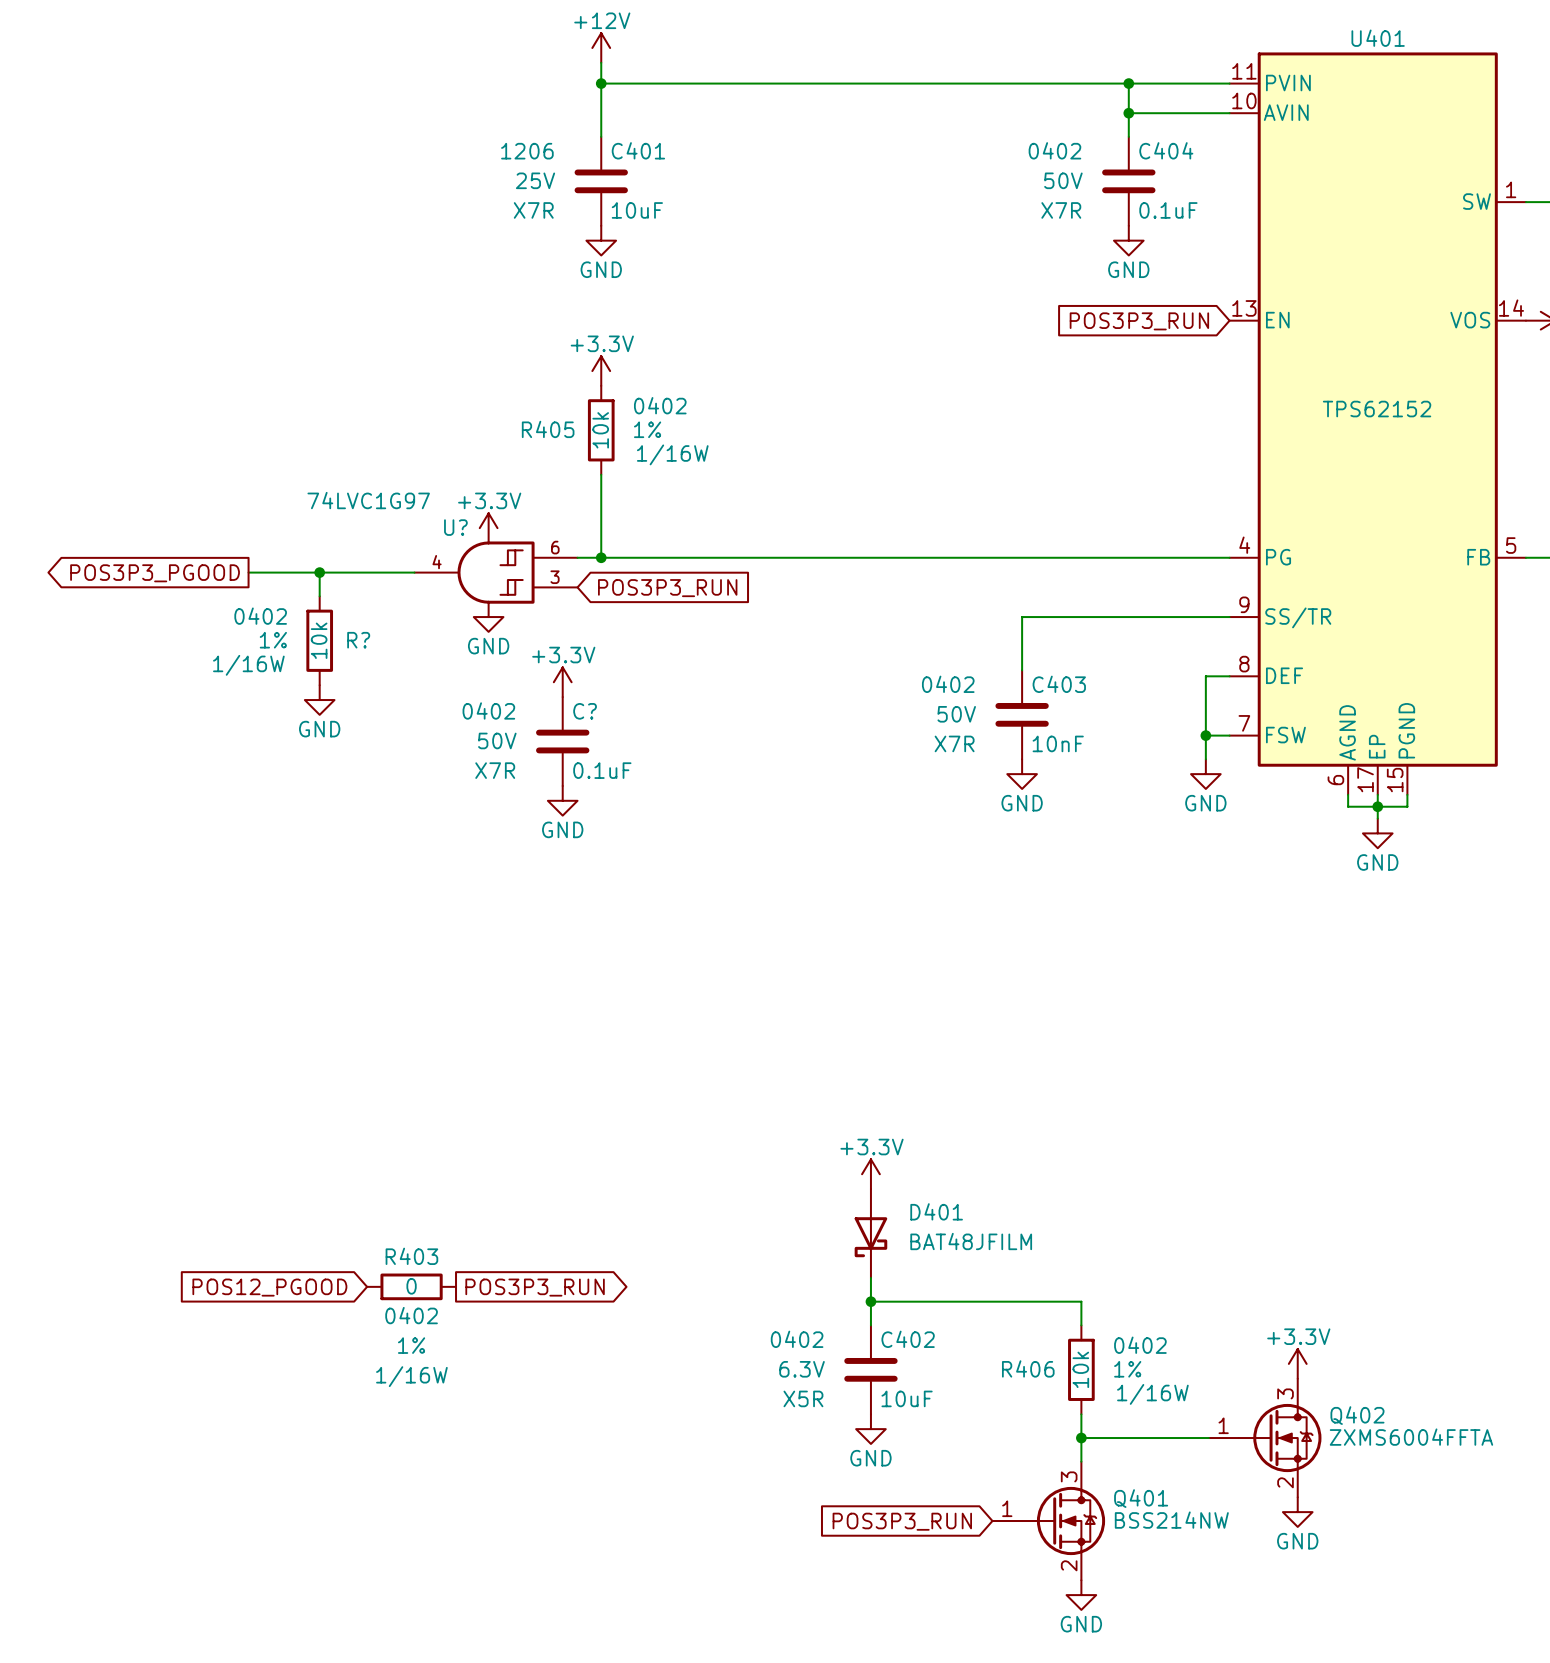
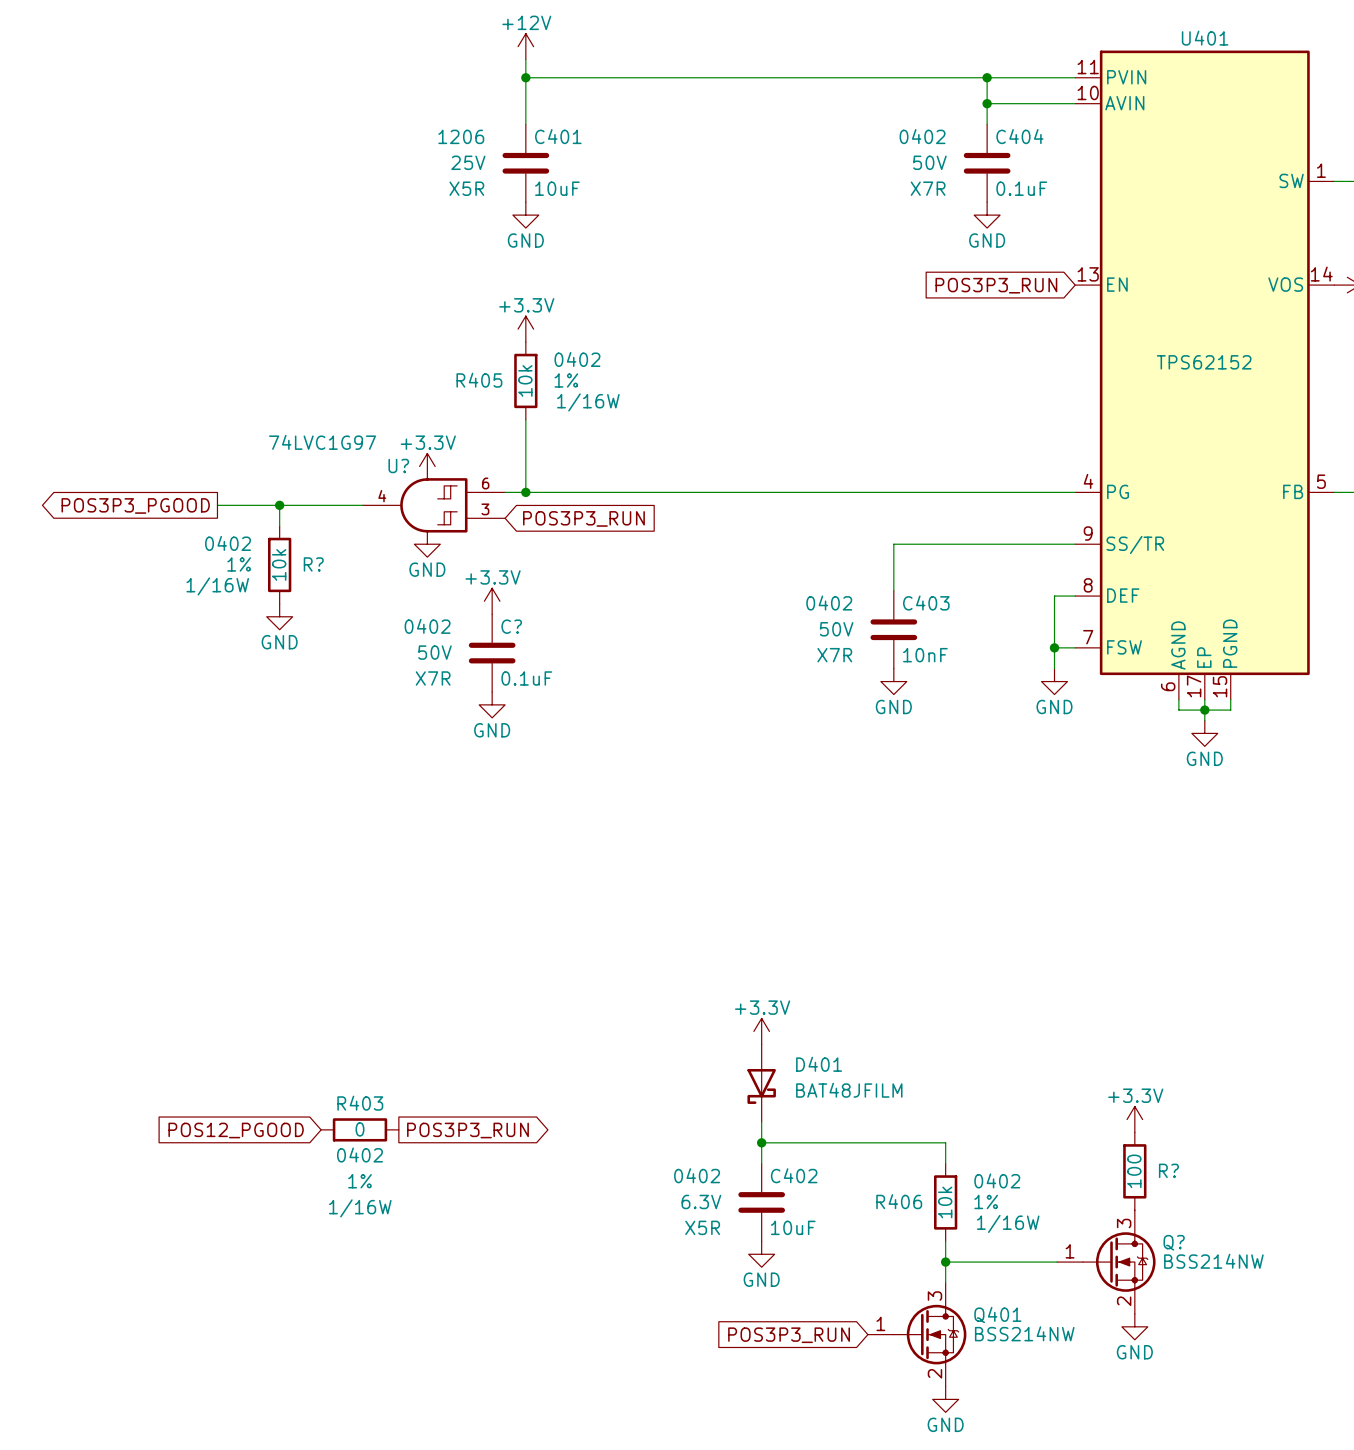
C401 text: X7R (533, 210) -> X5R (466, 188)
R?: none -> 100 (1134, 1171)
power symbol position: +3.3V (1297, 1363) -> +3.3V (1134, 1119)
Q402 name: Q402 (1357, 1415) -> Q? (1174, 1242)
Q402 value: ZXMS6004FFTA (1411, 1437) -> BSS214NW (1213, 1261)

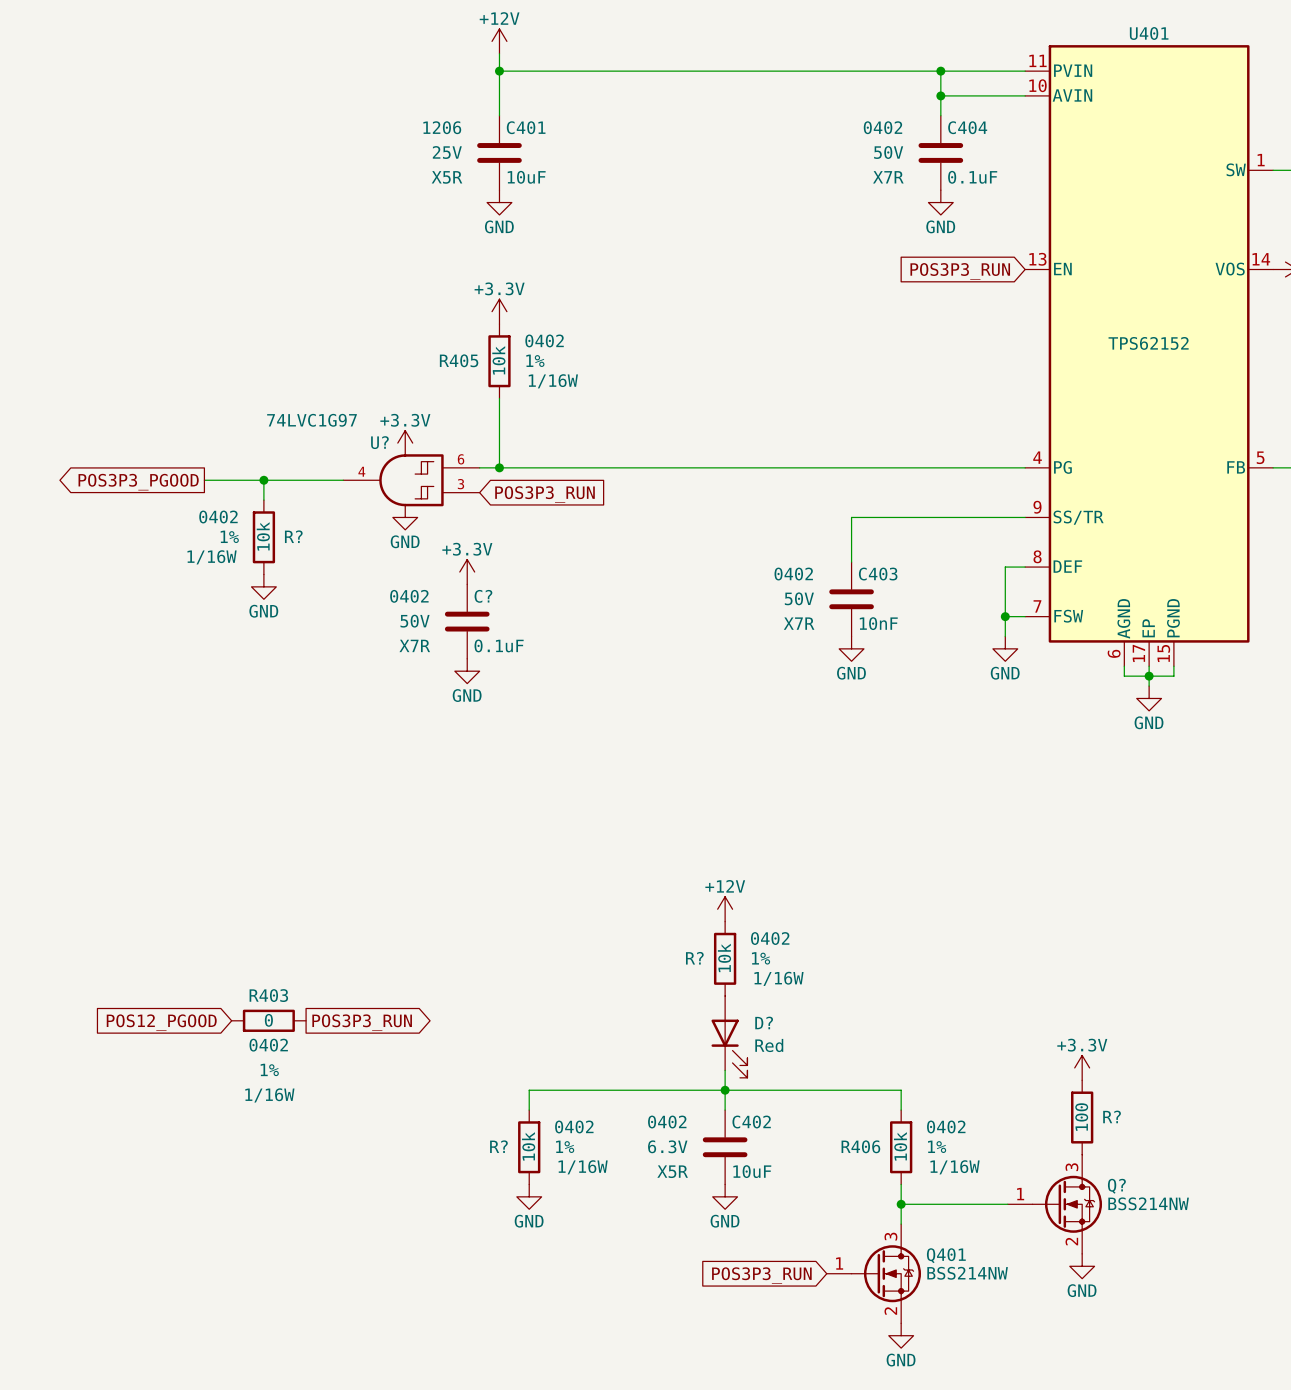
power symbol: none -> +12V (725, 909)
R?: none -> 10k (725, 958)
power symbol: +3.3V (761, 1031) -> none
D401: BAT48JFILM (761, 1083) -> none
D?: none -> Red (729, 1036)
R403 position: (359, 1129) -> (268, 1020)
global label position: POS12_PGOOD (236, 1130) -> POS12_PGOOD (161, 1022)
global label position: POS3P3_RUN (467, 1130) -> POS3P3_RUN (362, 1022)
wire: none -> (725, 1090) (529, 1090) (529, 1110)
R?: none -> 10k (529, 1147)
power symbol: none -> GND (529, 1196)

